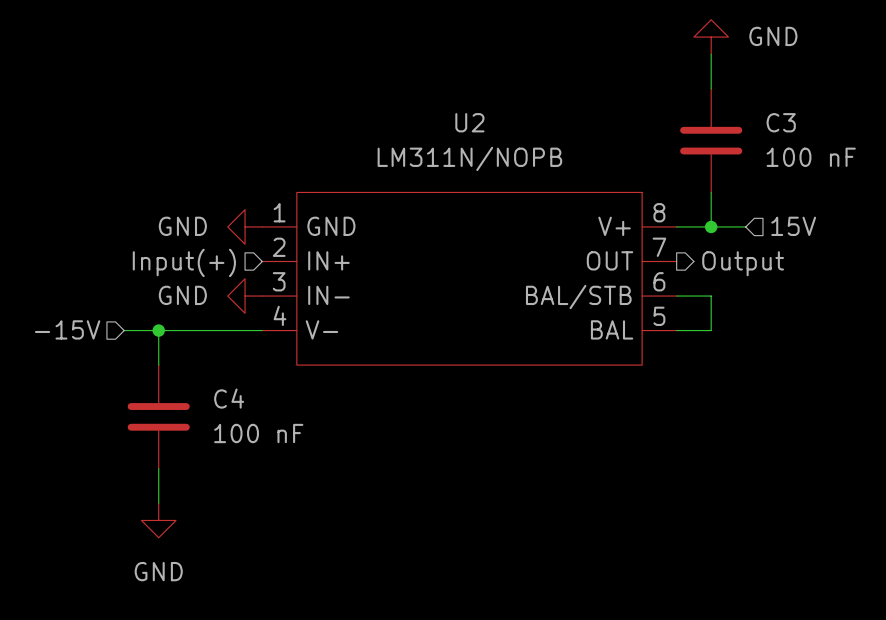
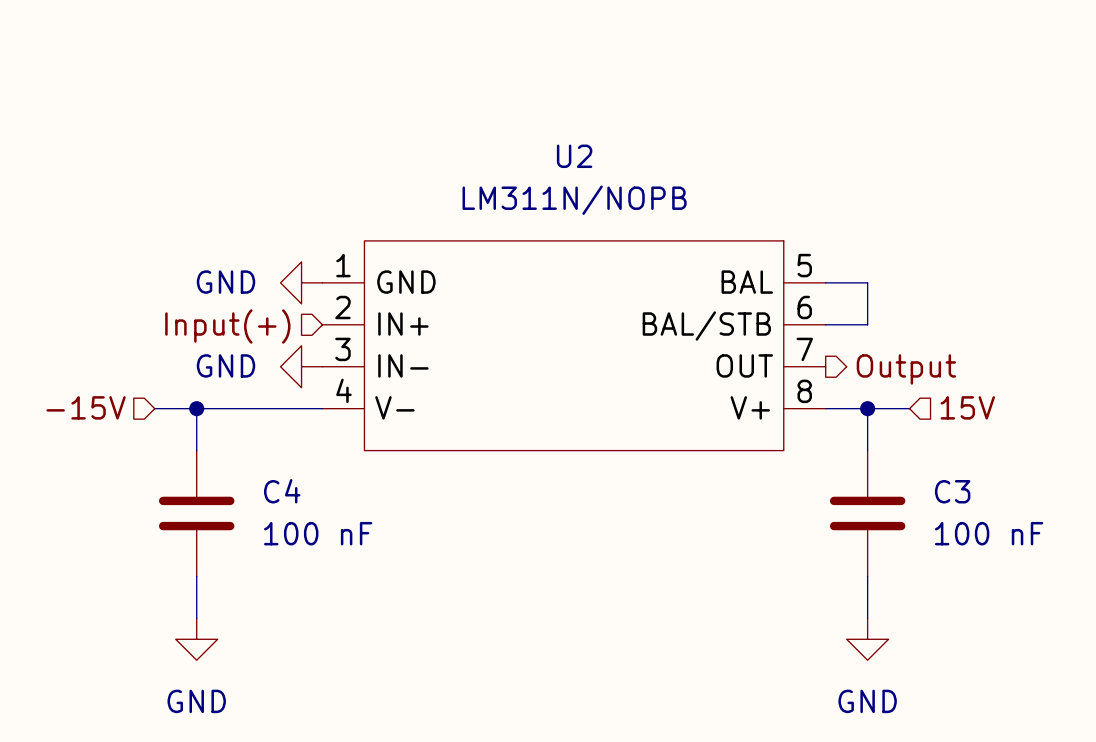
power symbol: GND (711, 37) -> none
wire: (711, 54) (711, 88) -> none
C3 position: (711, 140) -> (867, 513)
wire: (711, 192) (711, 226) (745, 226) -> none
U2 pin number: 8 (659, 212) -> 5 (804, 265)
U2 pin name: V+ (614, 226) -> BAL (747, 282)
wire: none -> (867, 282) (867, 324) (825, 324)
junction: (711, 226) -> none
hierarchical label position: 15V (793, 226) -> 15V (967, 407)
U2 pin number: 7 (659, 247) -> 6 (804, 307)
U2 pin name: OUT (610, 260) -> BAL/STB (706, 326)
hierarchical label position: Output (743, 263) -> Output (906, 369)
U2 pin number: 6 (659, 281) -> 7 (804, 349)
wire: (676, 296) (711, 296) (711, 330) -> none
U2 pin name: BAL/STB (578, 297) -> OUT (744, 365)
U2 pin number: 5 (659, 316) -> 8 (804, 391)
U2 pin name: BAL (612, 329) -> V+ (750, 407)
junction: none -> (867, 408)
wire: none -> (909, 408) (867, 408) (867, 450)
wire: none -> (867, 576) (867, 618)
power symbol: none -> GND (867, 639)

